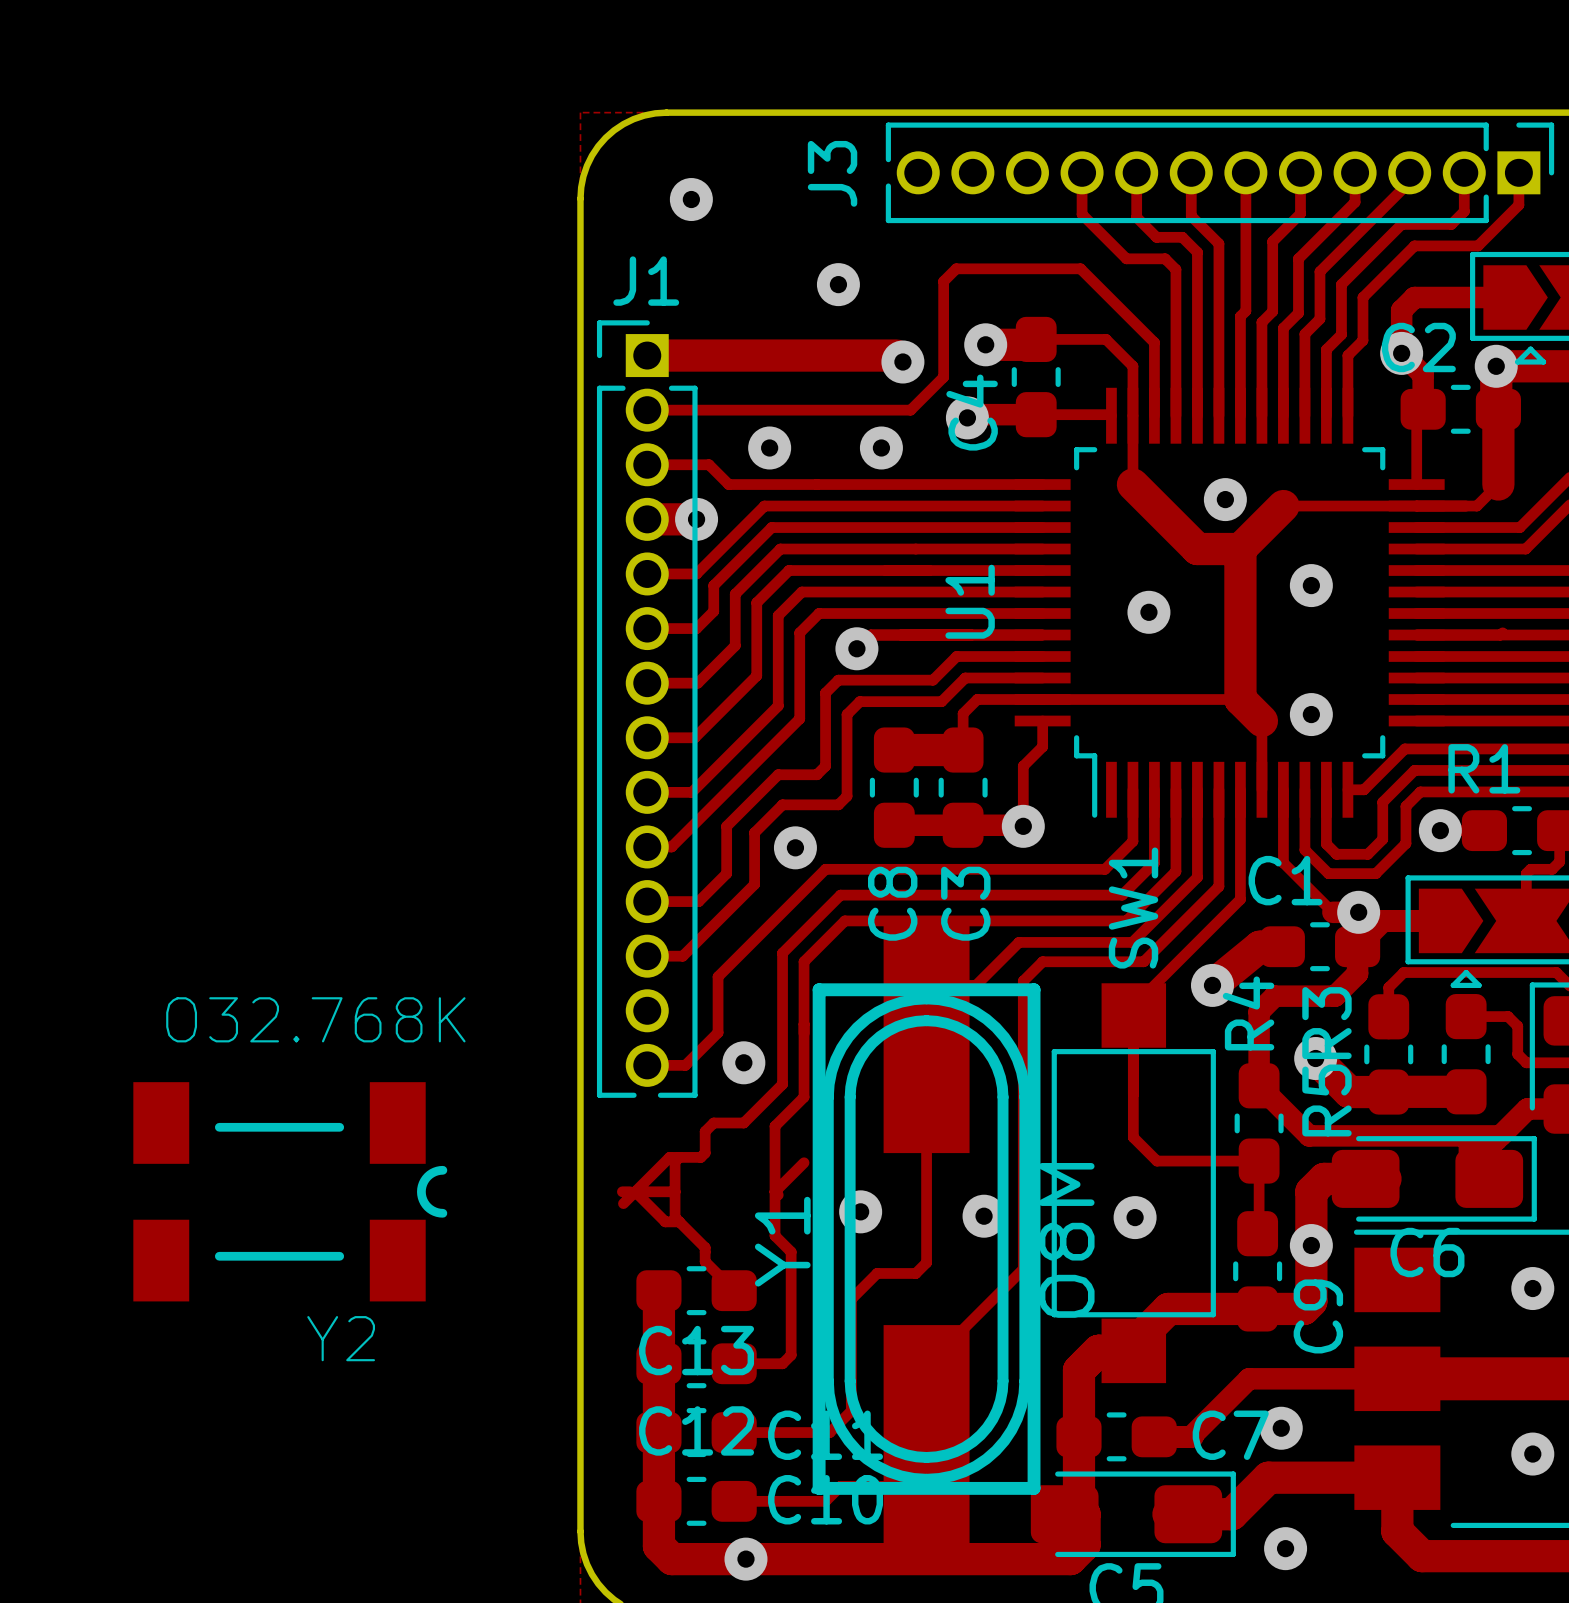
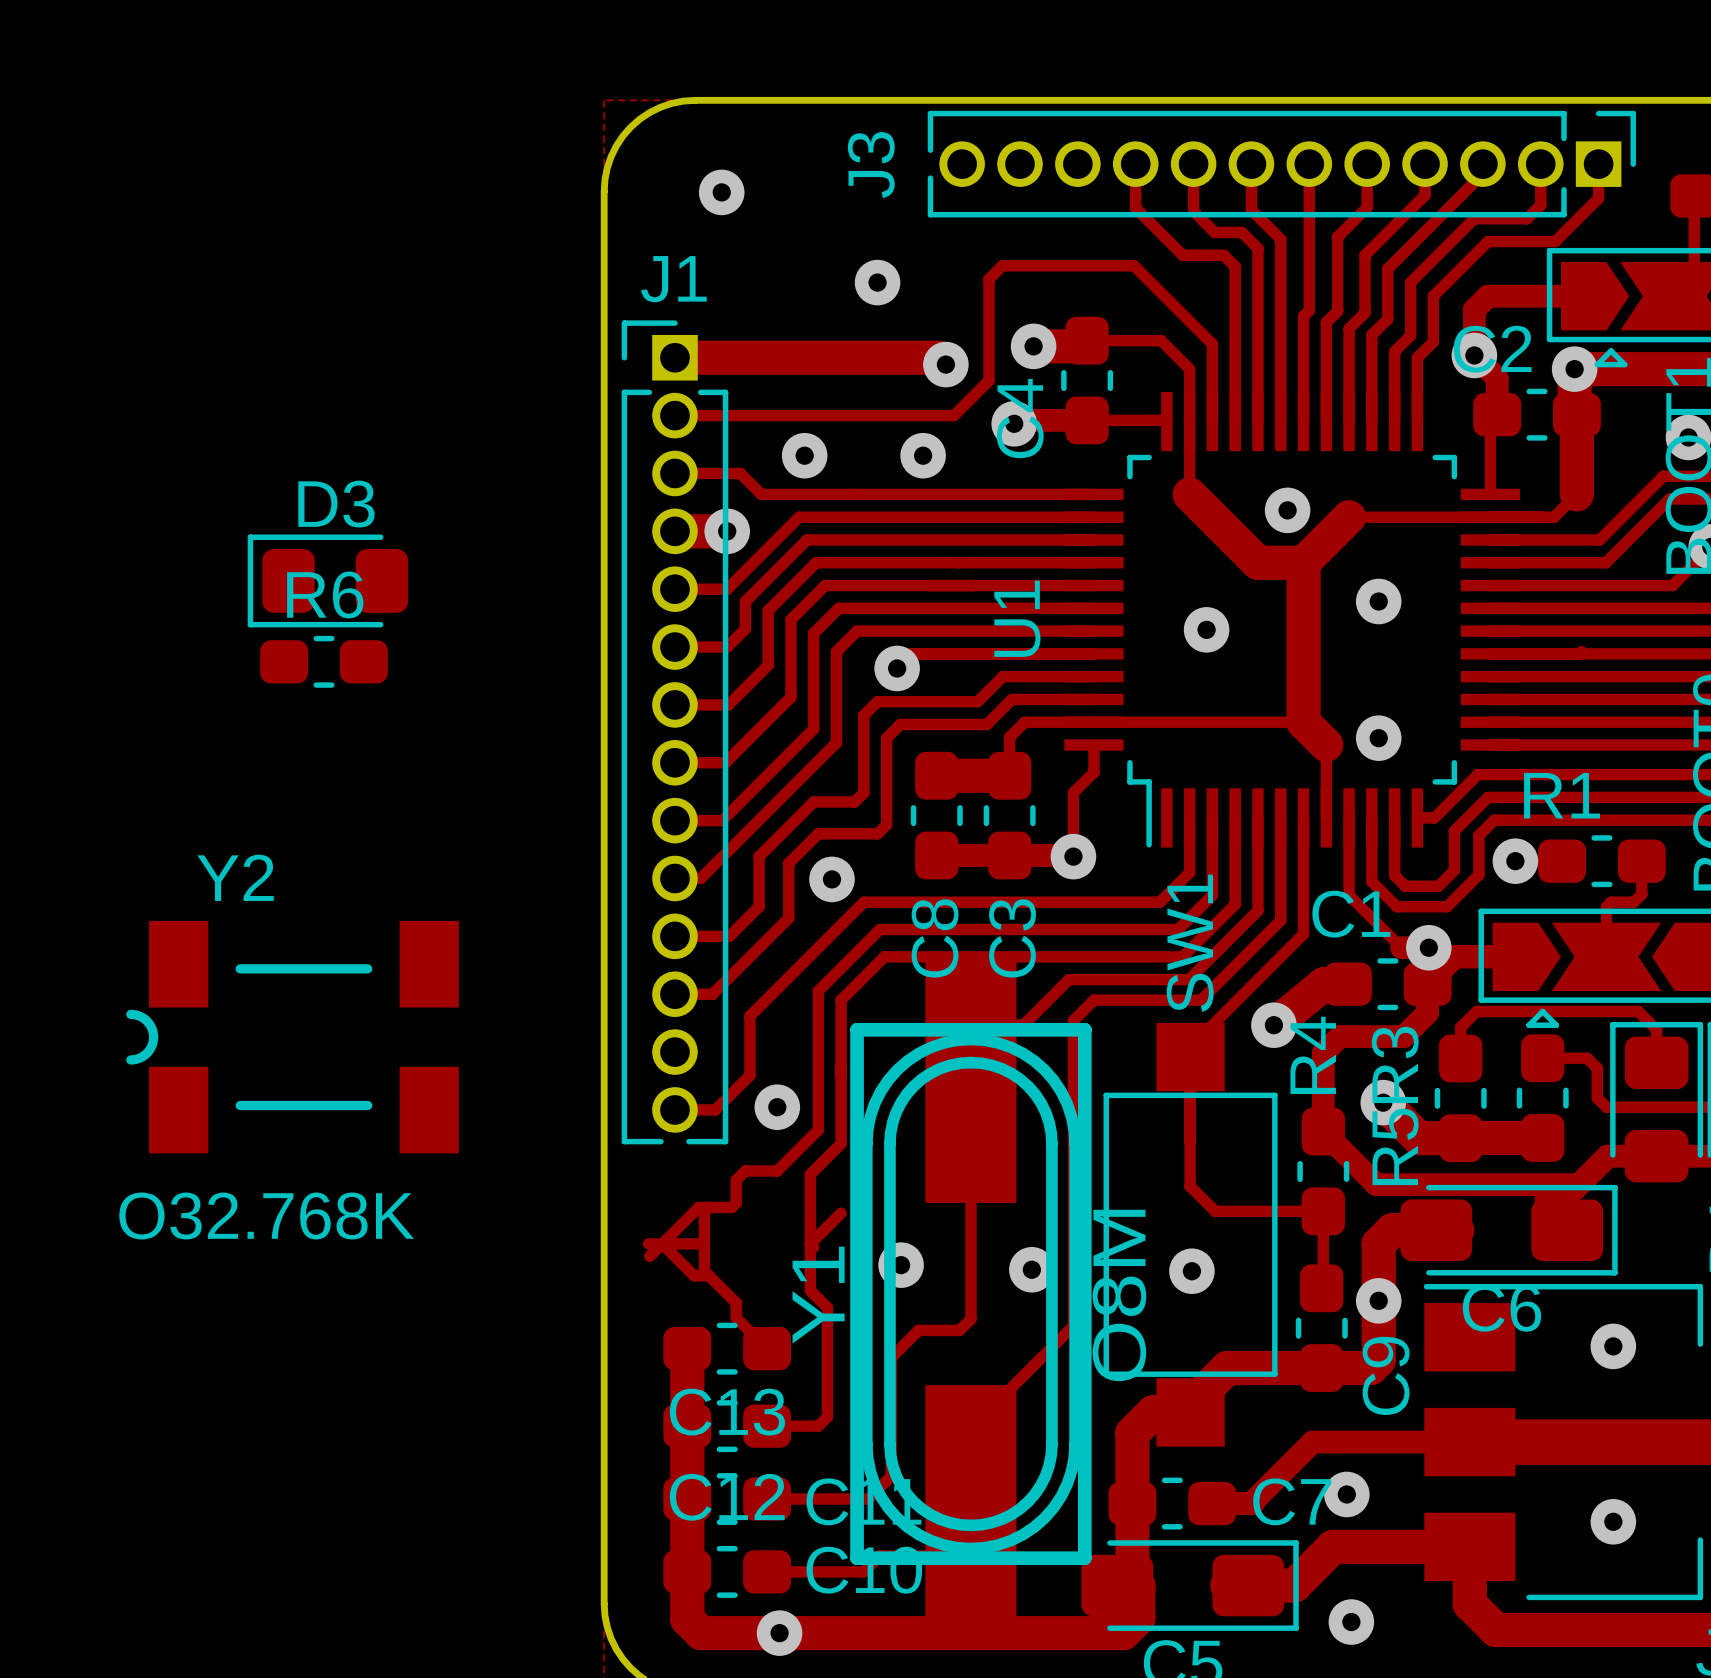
D3: none -> (327, 580)
R6: none -> (324, 661)
Y2 rotation: 0° (290, 1191) -> 180° (292, 1037)
Y2 position: (290, 1191) -> (292, 1037)

